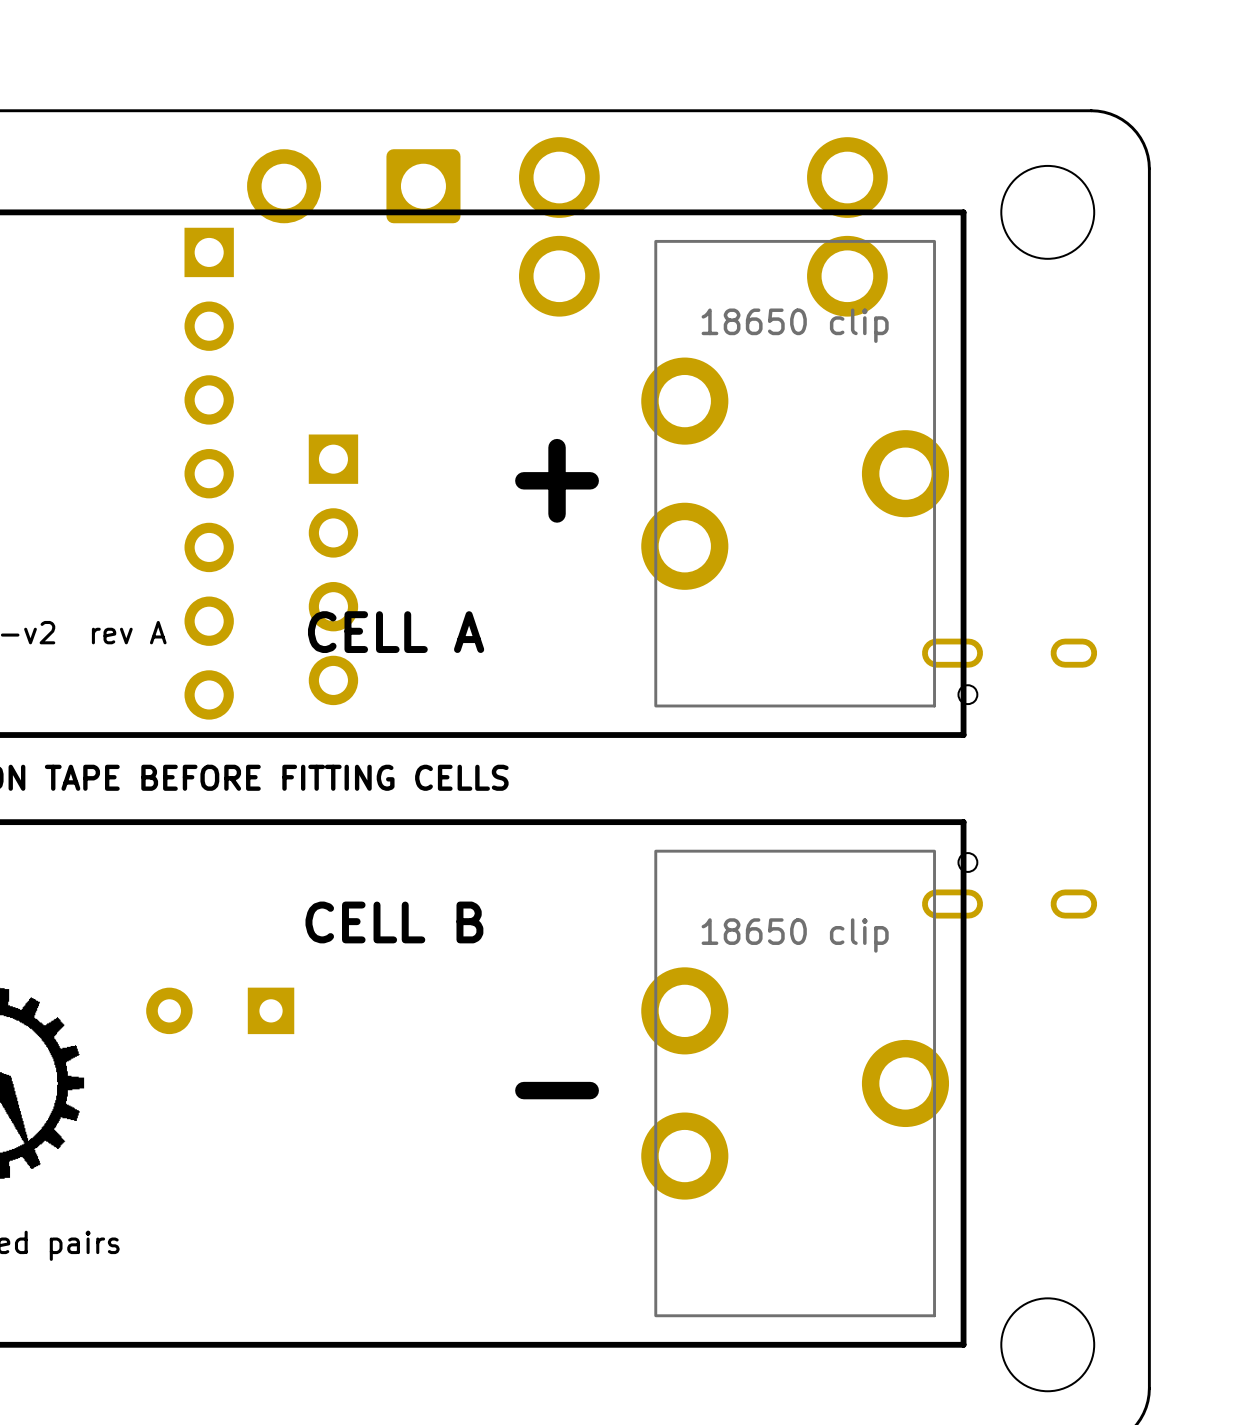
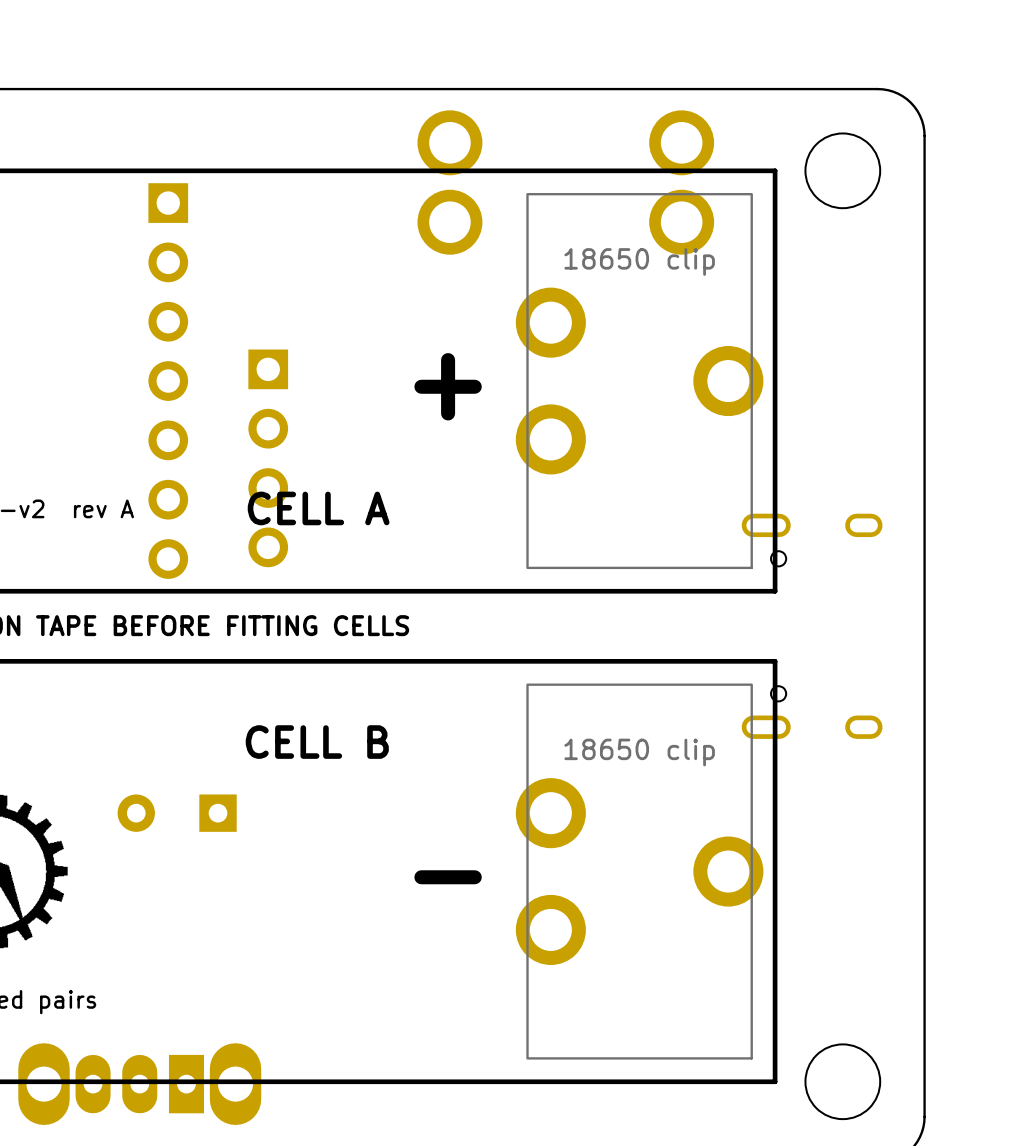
part: (353, 186) -> none
part: none -> (139, 1084)

